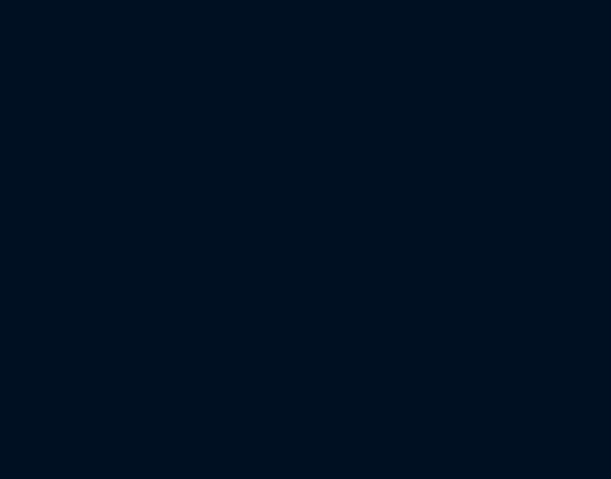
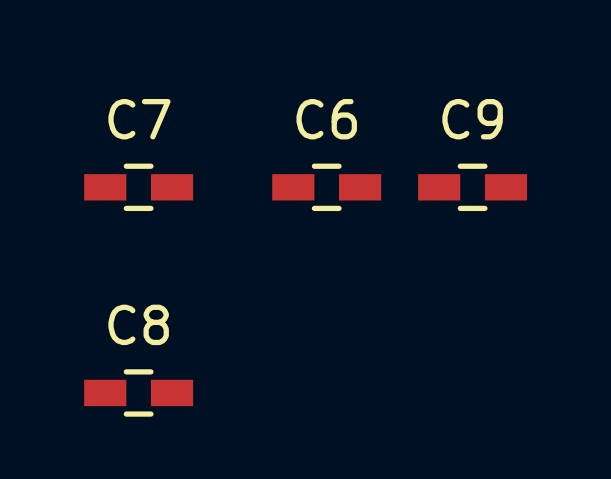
C7: none -> (138, 187)
C6: none -> (326, 187)
C9: none -> (472, 187)
C8: none -> (138, 392)

